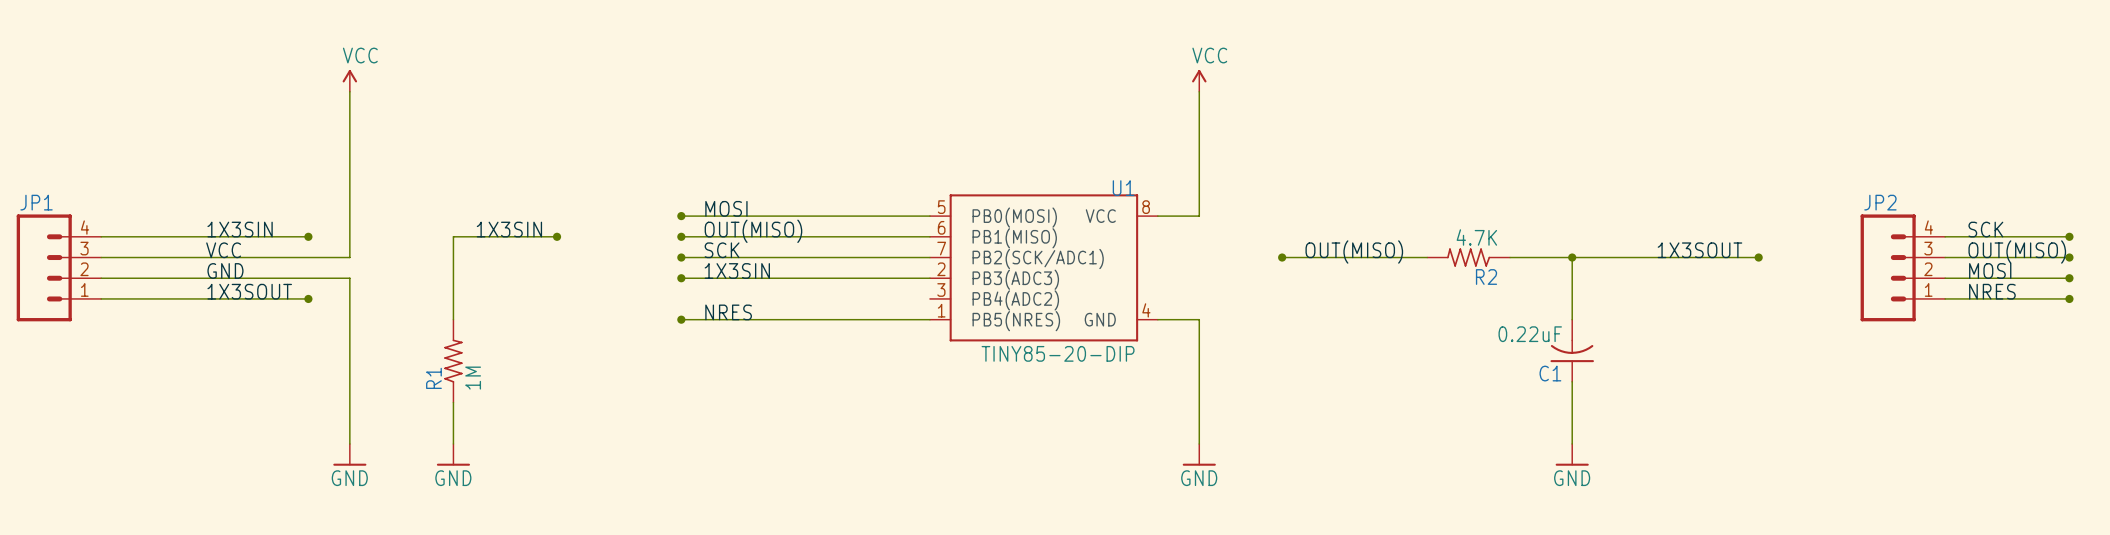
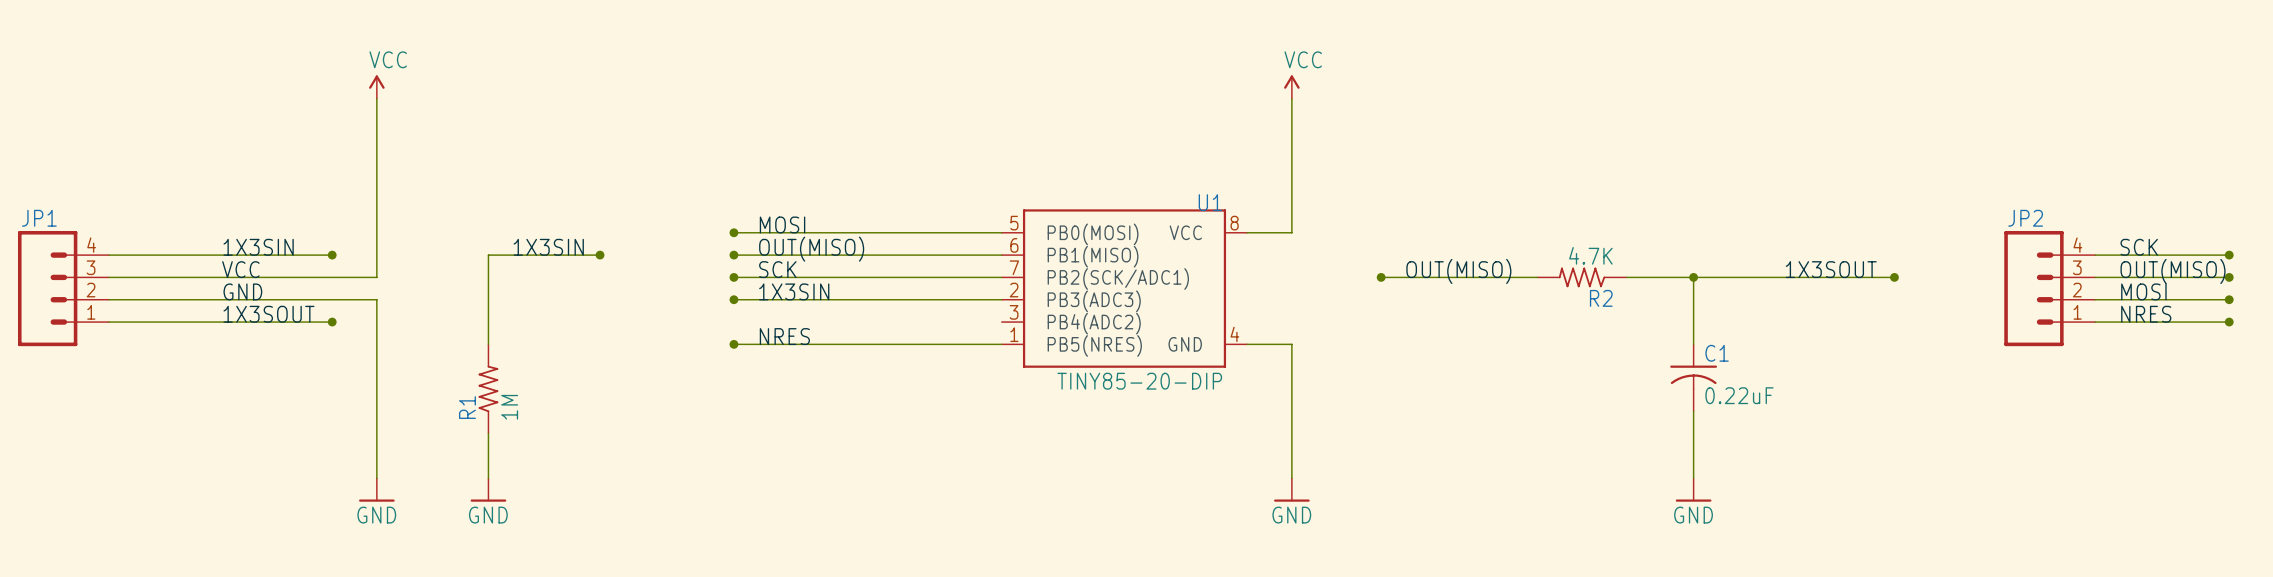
C1 rotation: 0° (1572, 350) -> 180° (1693, 377)

